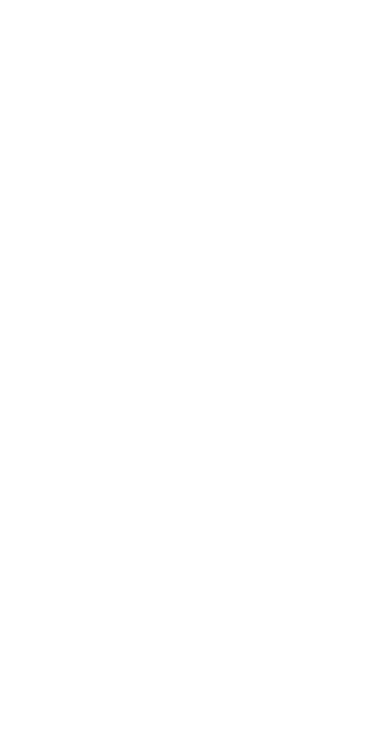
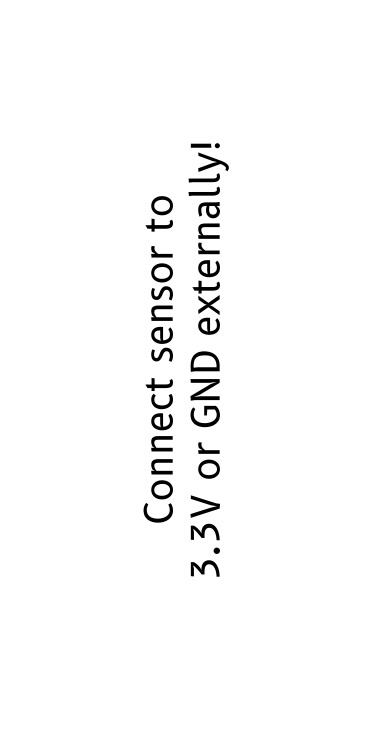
text: none -> Connect sensor to (158, 359)
text: none -> 3.3V or GND externally! (208, 359)

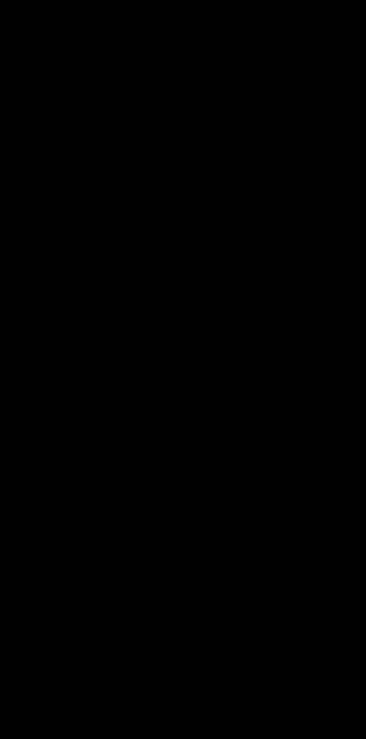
text: Connect sensor to (158, 359) -> none
text: 3.3V or GND externally! (208, 359) -> none

